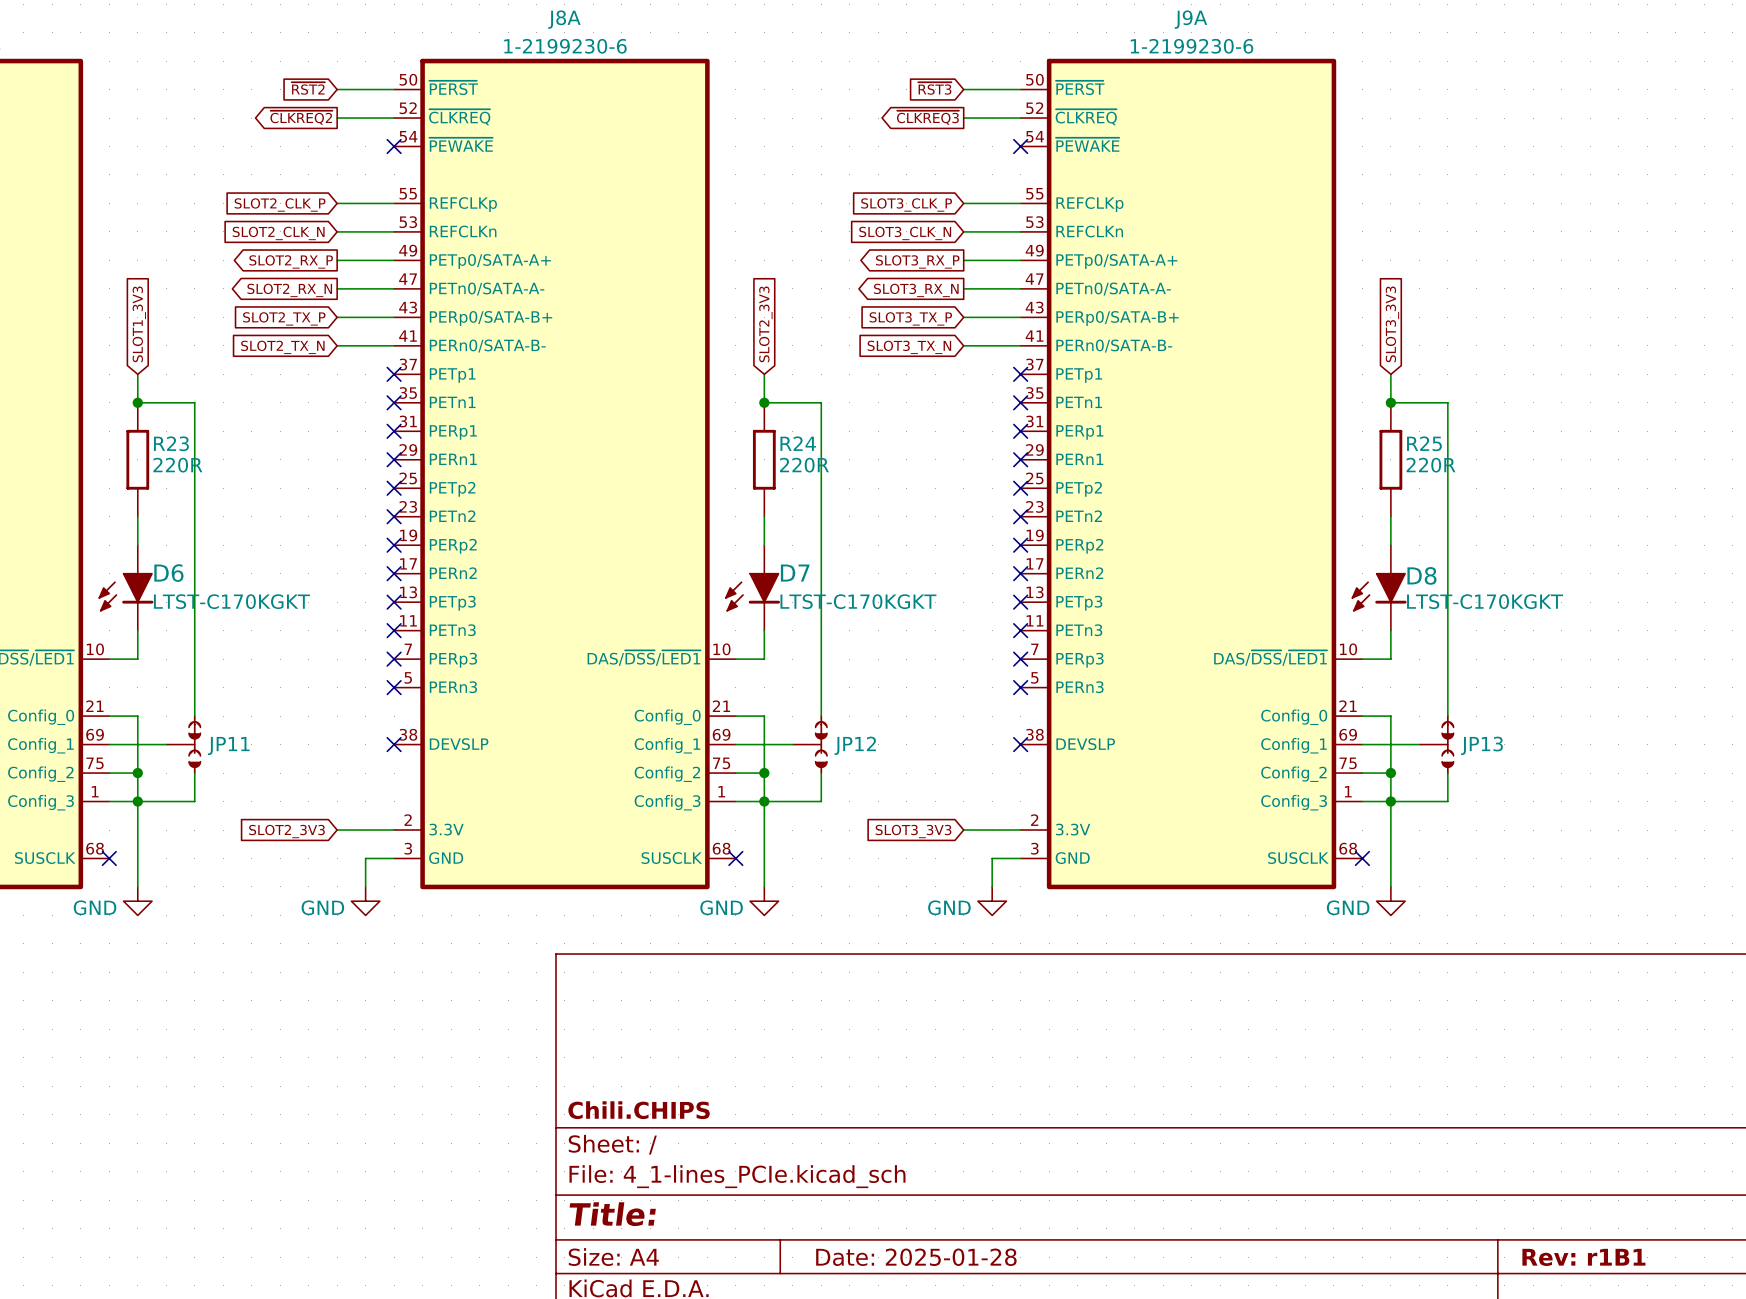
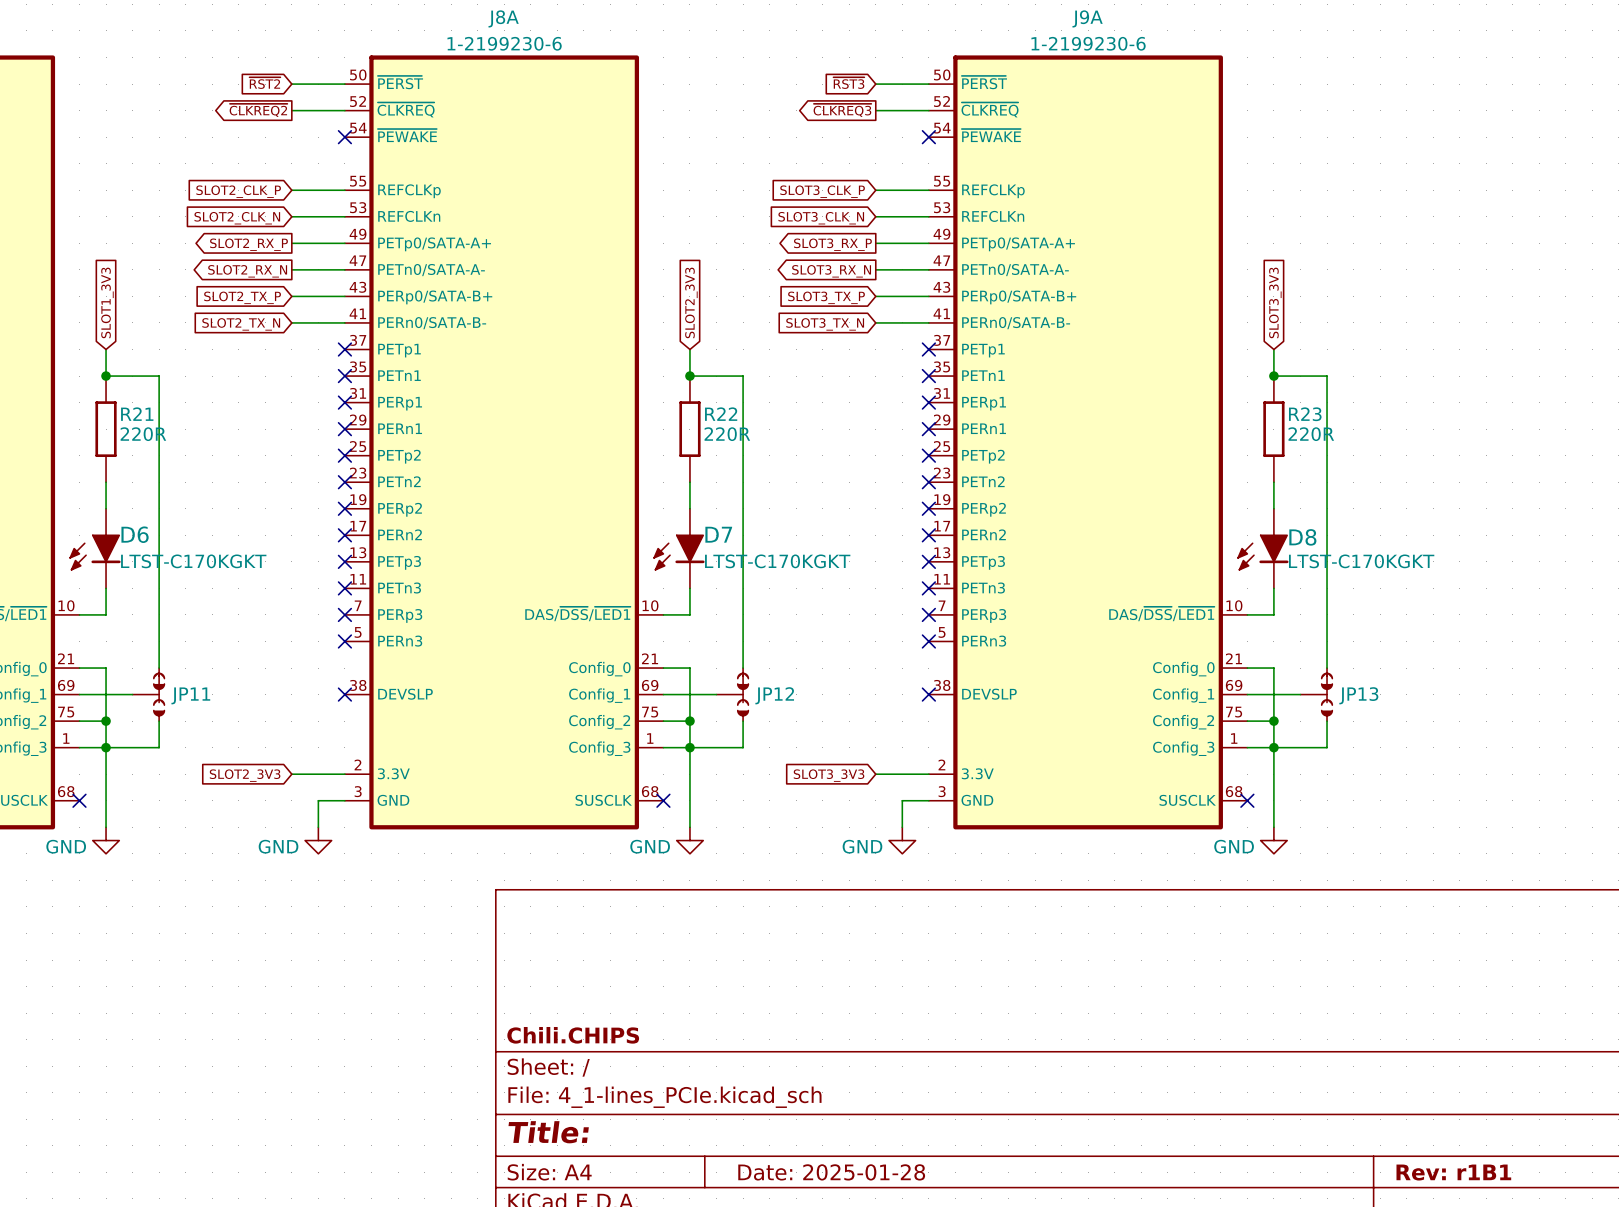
R23 name: R23 (171, 443) -> R21 (137, 414)
R24 name: R24 (798, 443) -> R22 (721, 414)
R25 name: R25 (1424, 443) -> R23 (1305, 414)

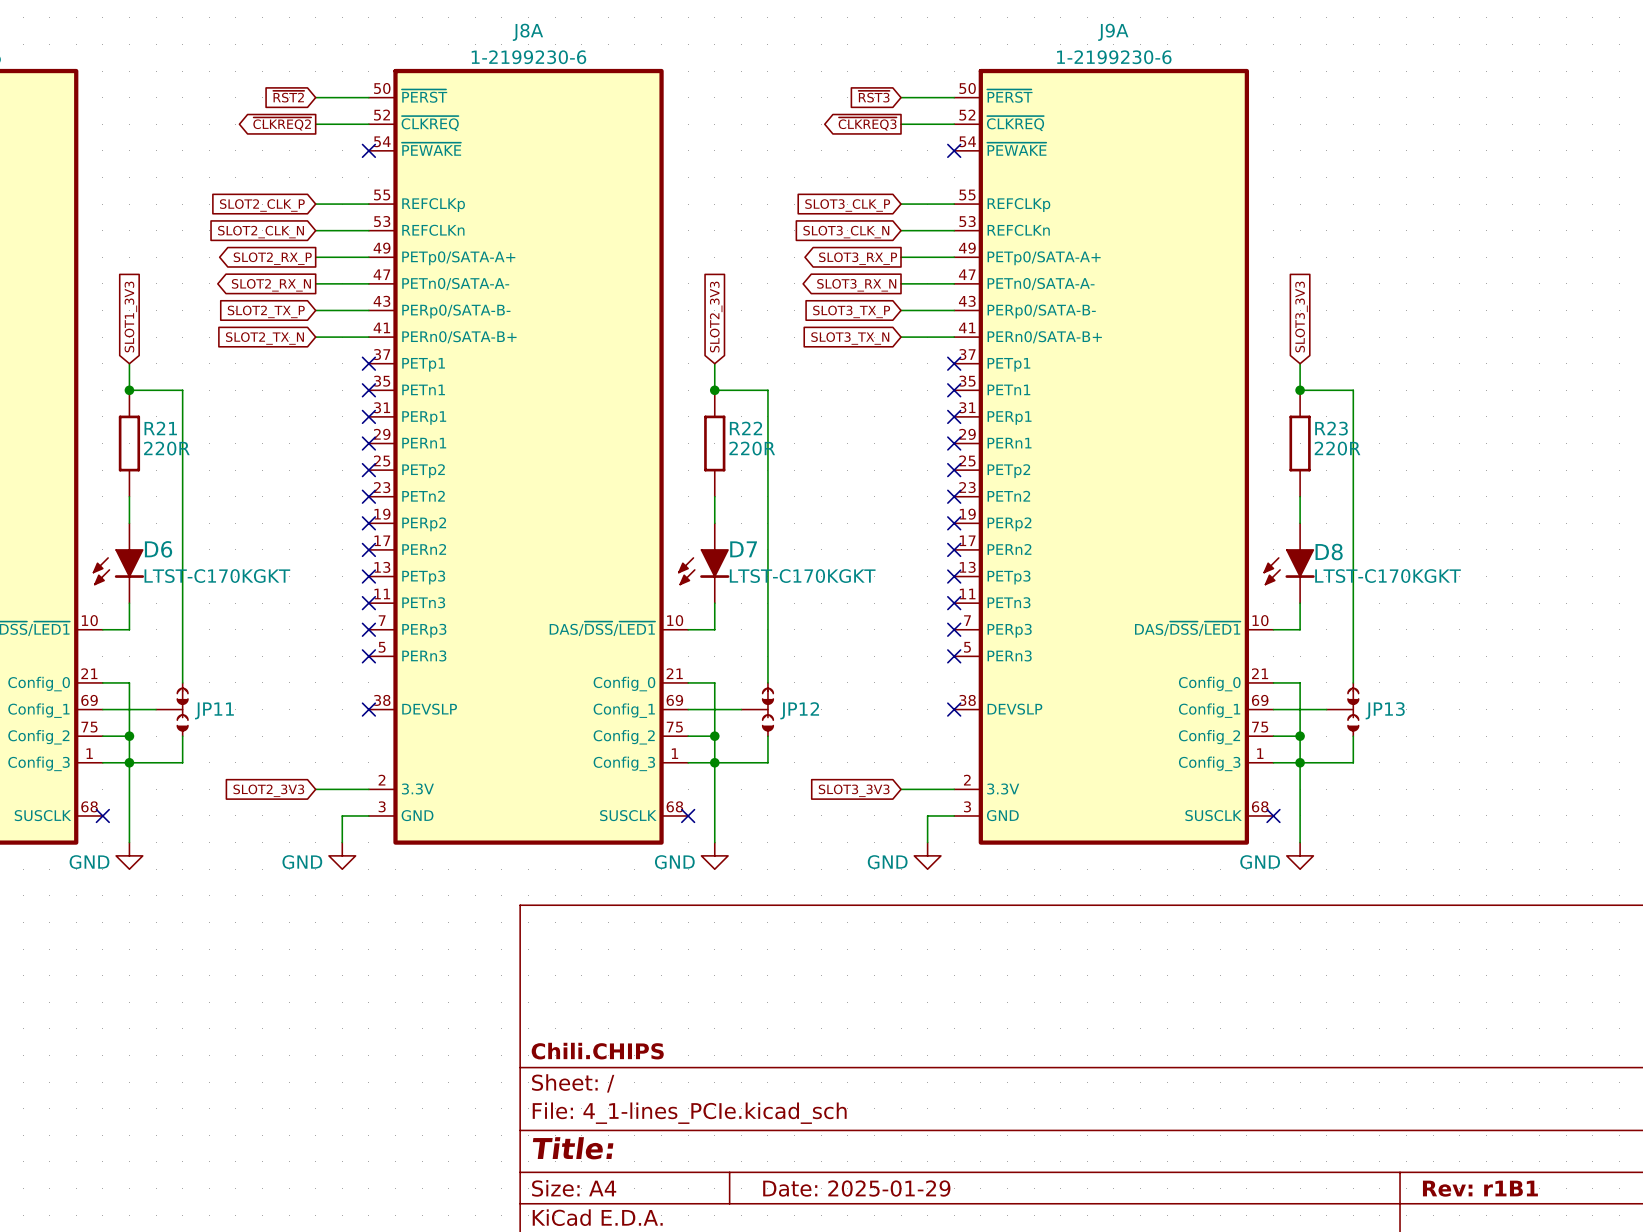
J8A pin name: PERp0/SATA-B+ (435, 297) -> PERp0/SATA-B- (456, 311)
J9A pin name: PERp0/SATA-B+ (1019, 297) -> PERp0/SATA-B- (1041, 311)
J8A pin name: PERn0/SATA-B- (432, 323) -> PERn0/SATA-B+ (459, 337)
J9A pin name: PERn0/SATA-B- (1016, 323) -> PERn0/SATA-B+ (1044, 337)
title block: Date: 2025-01-28 (831, 1172) -> Date: 2025-01-29 (856, 1188)

